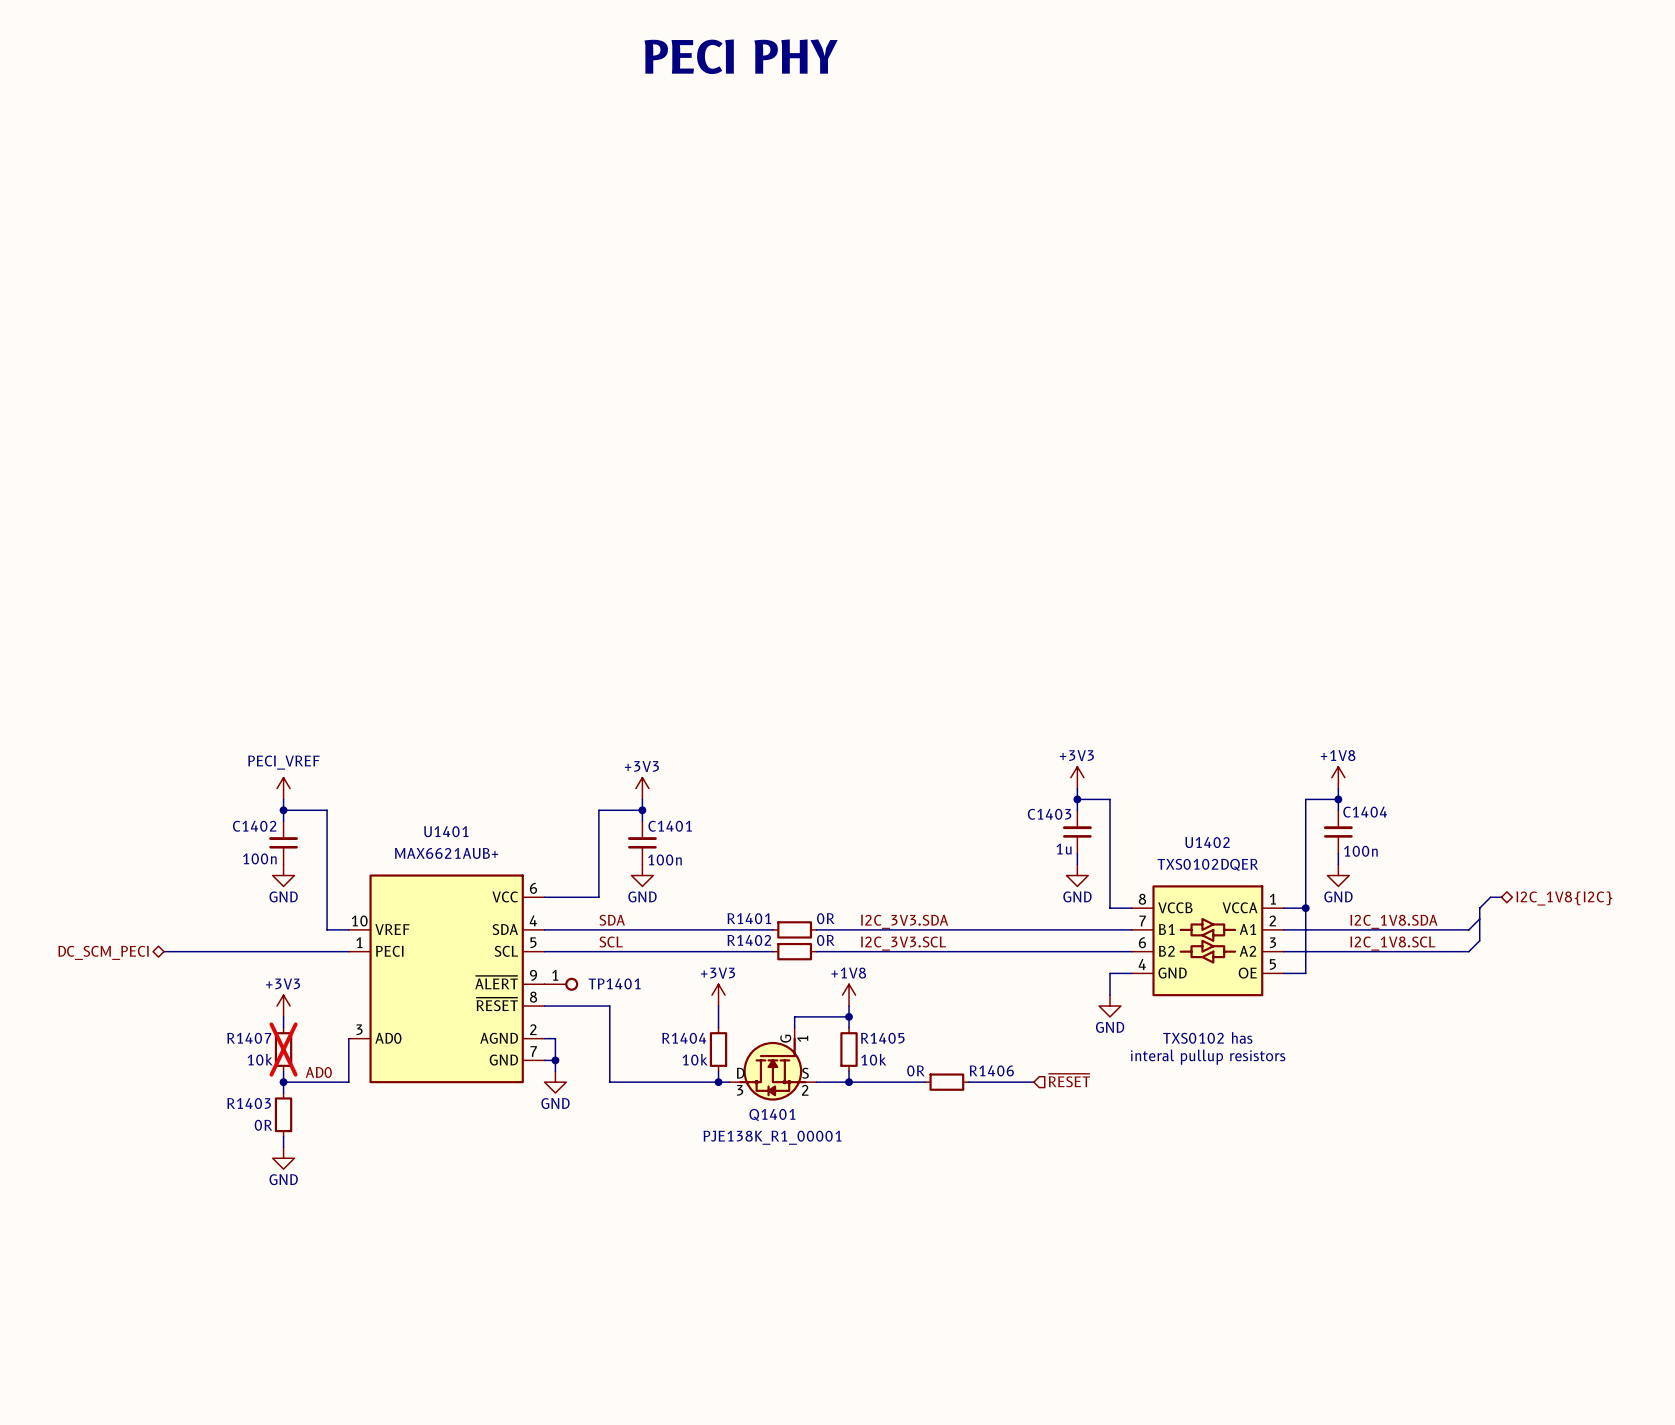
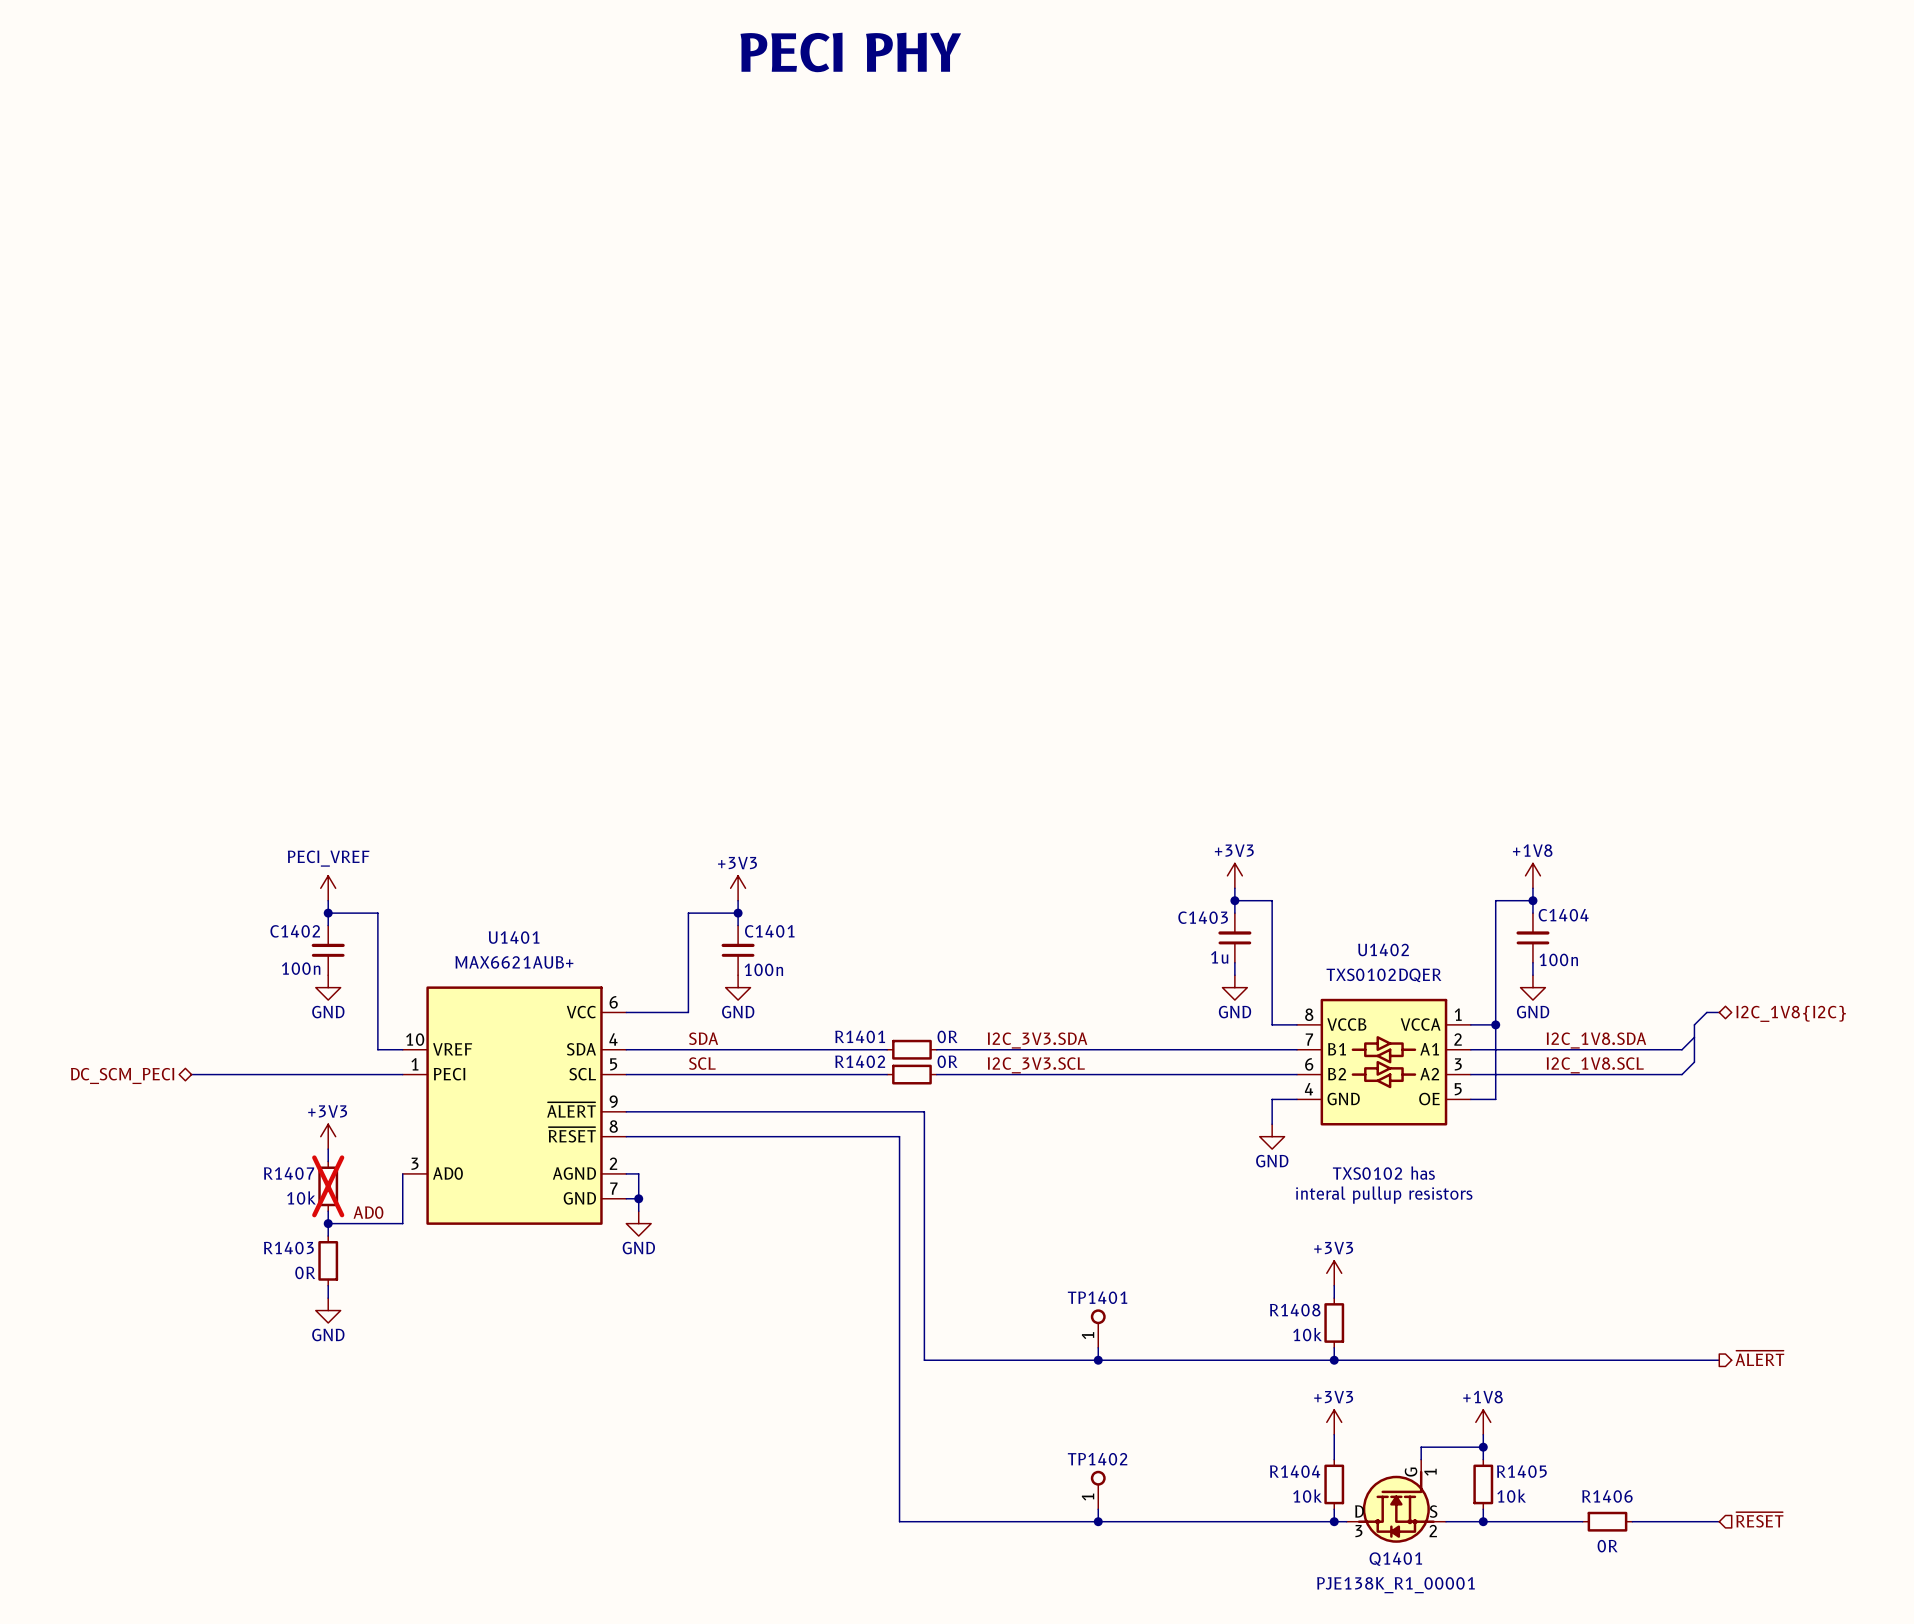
TP1401 name position: TP1401 (614, 983) -> TP1401 (1097, 1297)
wire: none -> (626, 1111) (924, 1111) (924, 1360) (1719, 1360)
TP1401 position: (561, 984) -> (1098, 1328)
TP1401 rotation: 0° (571, 984) -> 90° counterclockwise (1098, 1316)
power symbol: +3V3 (718, 995) -> none
power symbol: +1V8 (849, 995) -> none
wire: (609, 1006) (609, 1082) (729, 1082) -> (700, 1136) (899, 1136) (899, 1521) (1346, 1521)
wire: (718, 1006) (718, 1027) -> none
wire: (849, 1006) (849, 1027) -> none
wire: (849, 1016) (794, 1016) (794, 1027) -> none
junction: (849, 1016) -> none
R1404 position: (718, 1049) -> (1334, 1484)
R1405 position: (849, 1049) -> (1483, 1484)
Q1401 position: (772, 1064) -> (1396, 1501)
R1406 text position: 0R (915, 1070) -> 0R (1607, 1546)
R1406 name position: R1406 (991, 1070) -> R1406 (1607, 1496)
wire: (718, 1071) (718, 1082) -> none
wire: (849, 1071) (849, 1082) -> (1098, 1347) (1098, 1360)
hierarchical label: ~{RESET} (1069, 1080) -> none
junction: (718, 1082) -> none
wire: (816, 1082) (925, 1082) -> none
junction: (849, 1082) -> none
R1406 position: (946, 1082) -> (1607, 1521)
wire: (968, 1082) (1033, 1082) -> none
power symbol: none -> +3V3 (1334, 1273)
wire: none -> (1334, 1285) (1334, 1298)
R1408: none -> (1334, 1322)
wire: none -> (1334, 1347) (1334, 1360)
hierarchical label: none -> ~{ALERT} (1759, 1358)
junction: none -> (1098, 1360)
junction: none -> (1334, 1360)
power symbol: none -> +3V3 (1334, 1422)
power symbol: none -> +1V8 (1483, 1422)
wire: none -> (1334, 1434) (1334, 1459)
wire: none -> (1483, 1434) (1483, 1459)
wire: none -> (1483, 1447) (1421, 1447) (1421, 1459)
junction: none -> (1483, 1447)
TP1402: none -> (1098, 1490)
wire: none -> (1098, 1509) (1098, 1521)
wire: none -> (1334, 1509) (1334, 1521)
wire: none -> (1483, 1509) (1483, 1521)
hierarchical label: none -> ~{RESET} (1759, 1519)
junction: none -> (1098, 1521)
junction: none -> (1334, 1521)
wire: none -> (1446, 1521) (1582, 1521)
junction: none -> (1483, 1521)
wire: none -> (1632, 1521) (1719, 1521)

